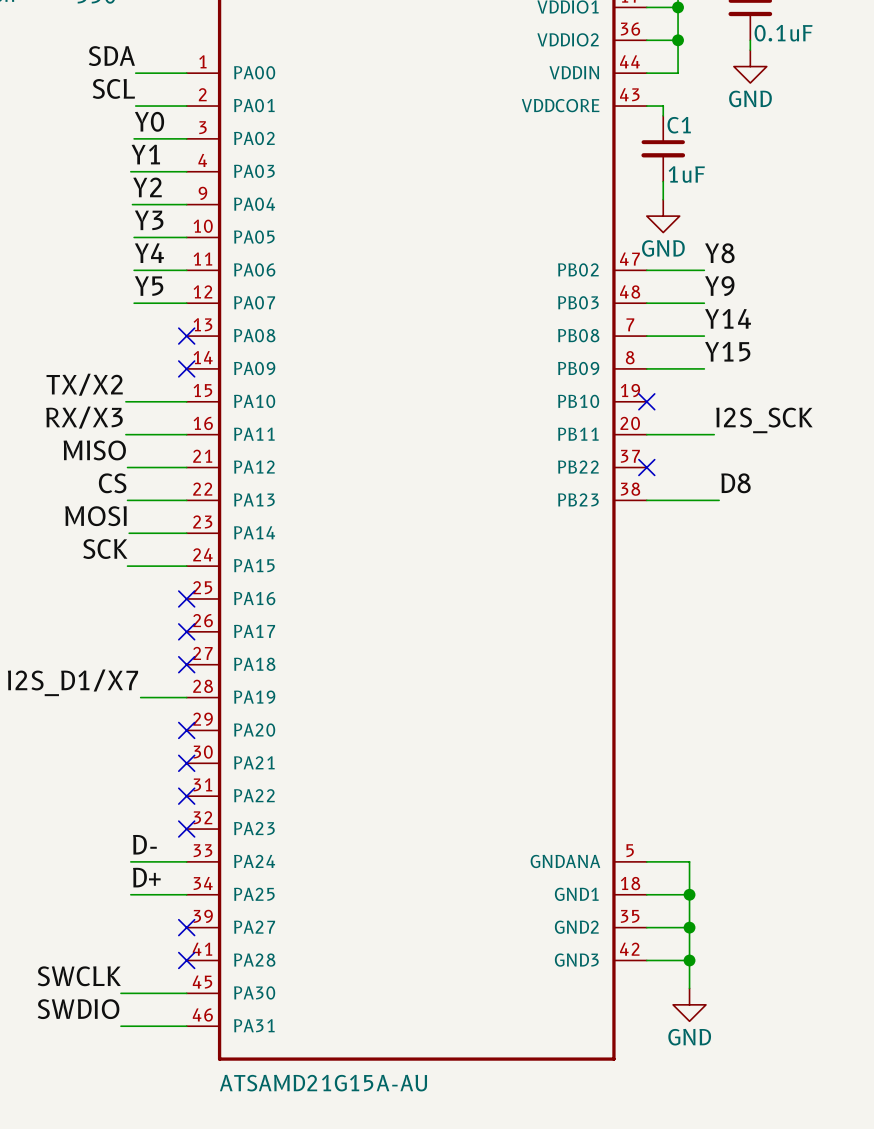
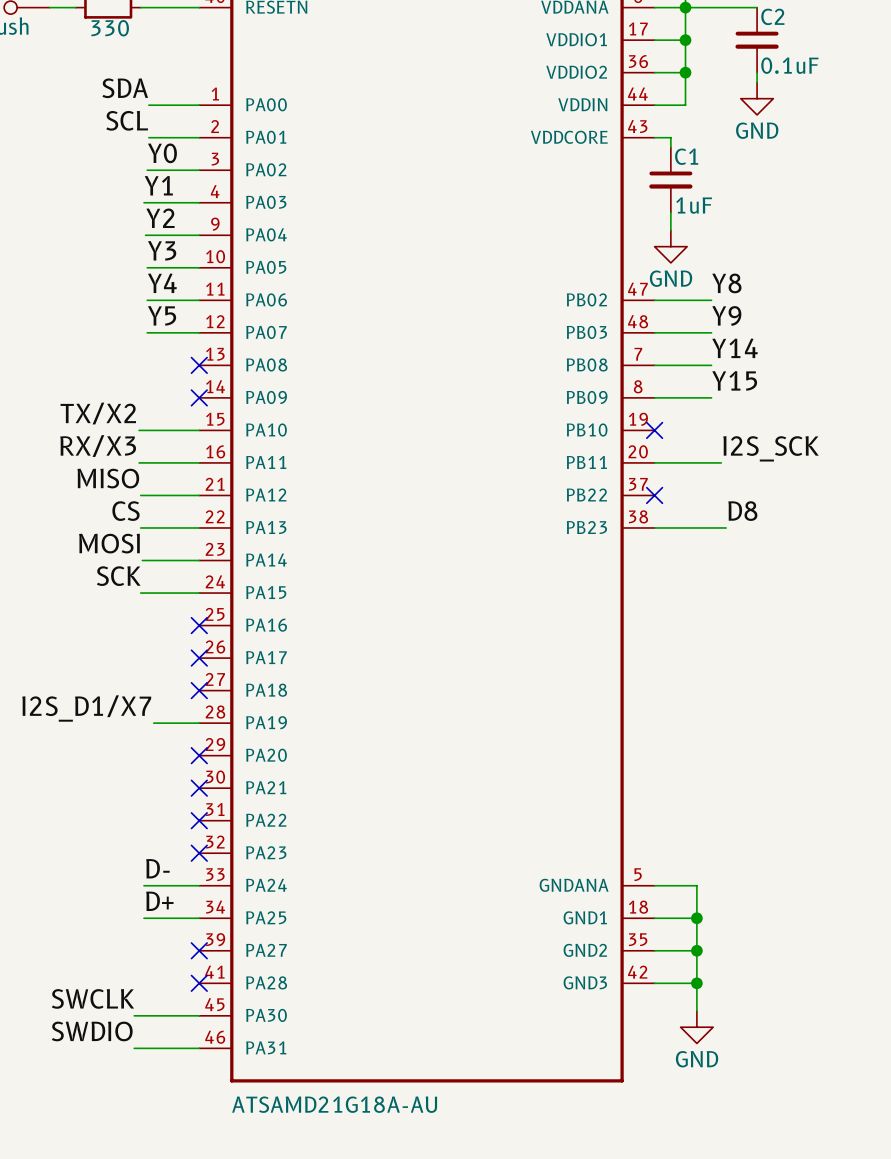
part value: ATSAMD21G15A-AU (323, 1083) -> ATSAMD21G18A-AU (334, 1104)

